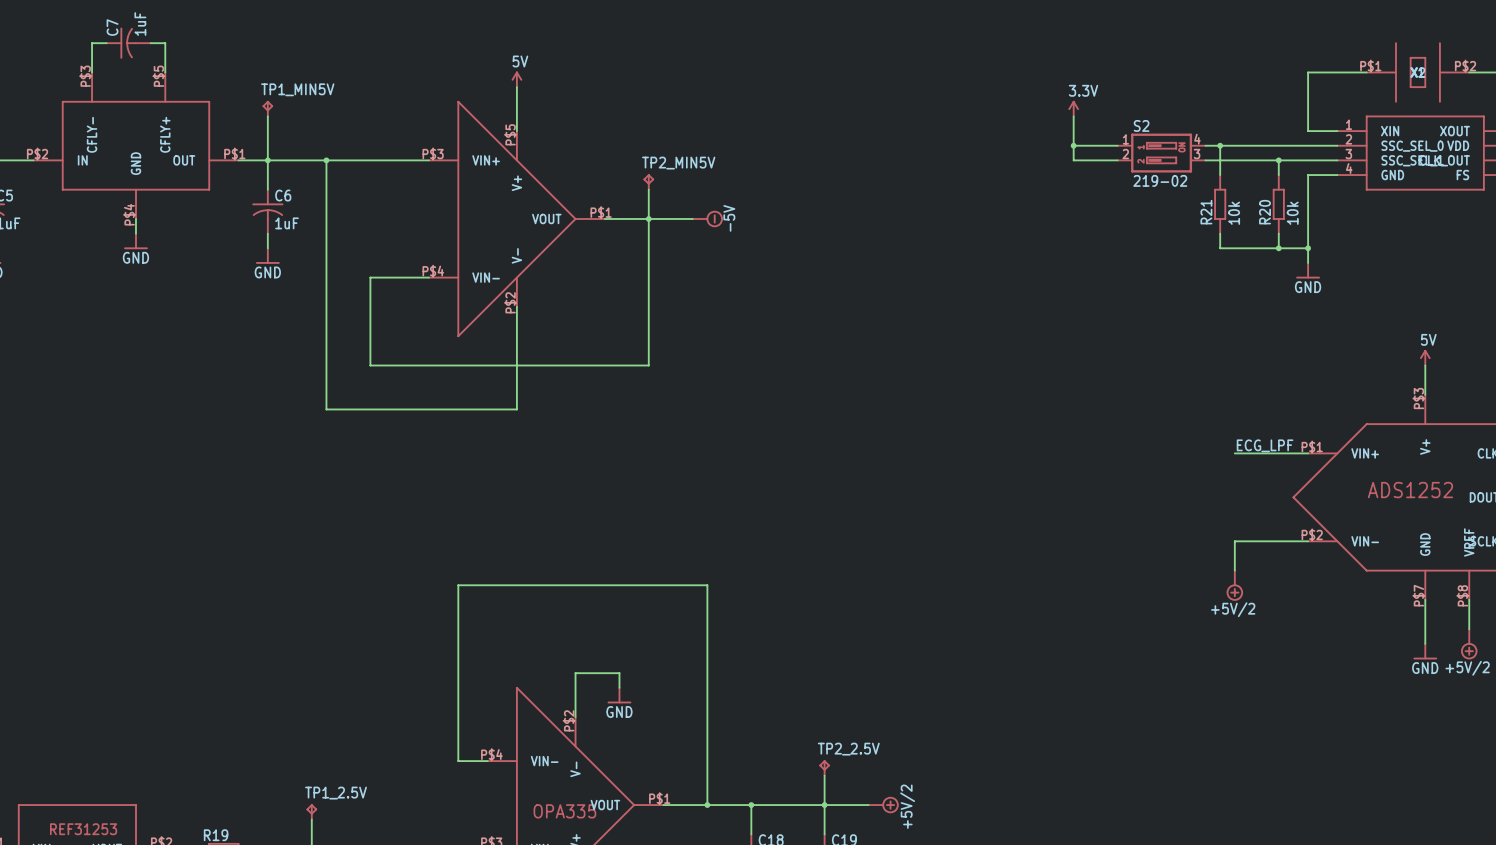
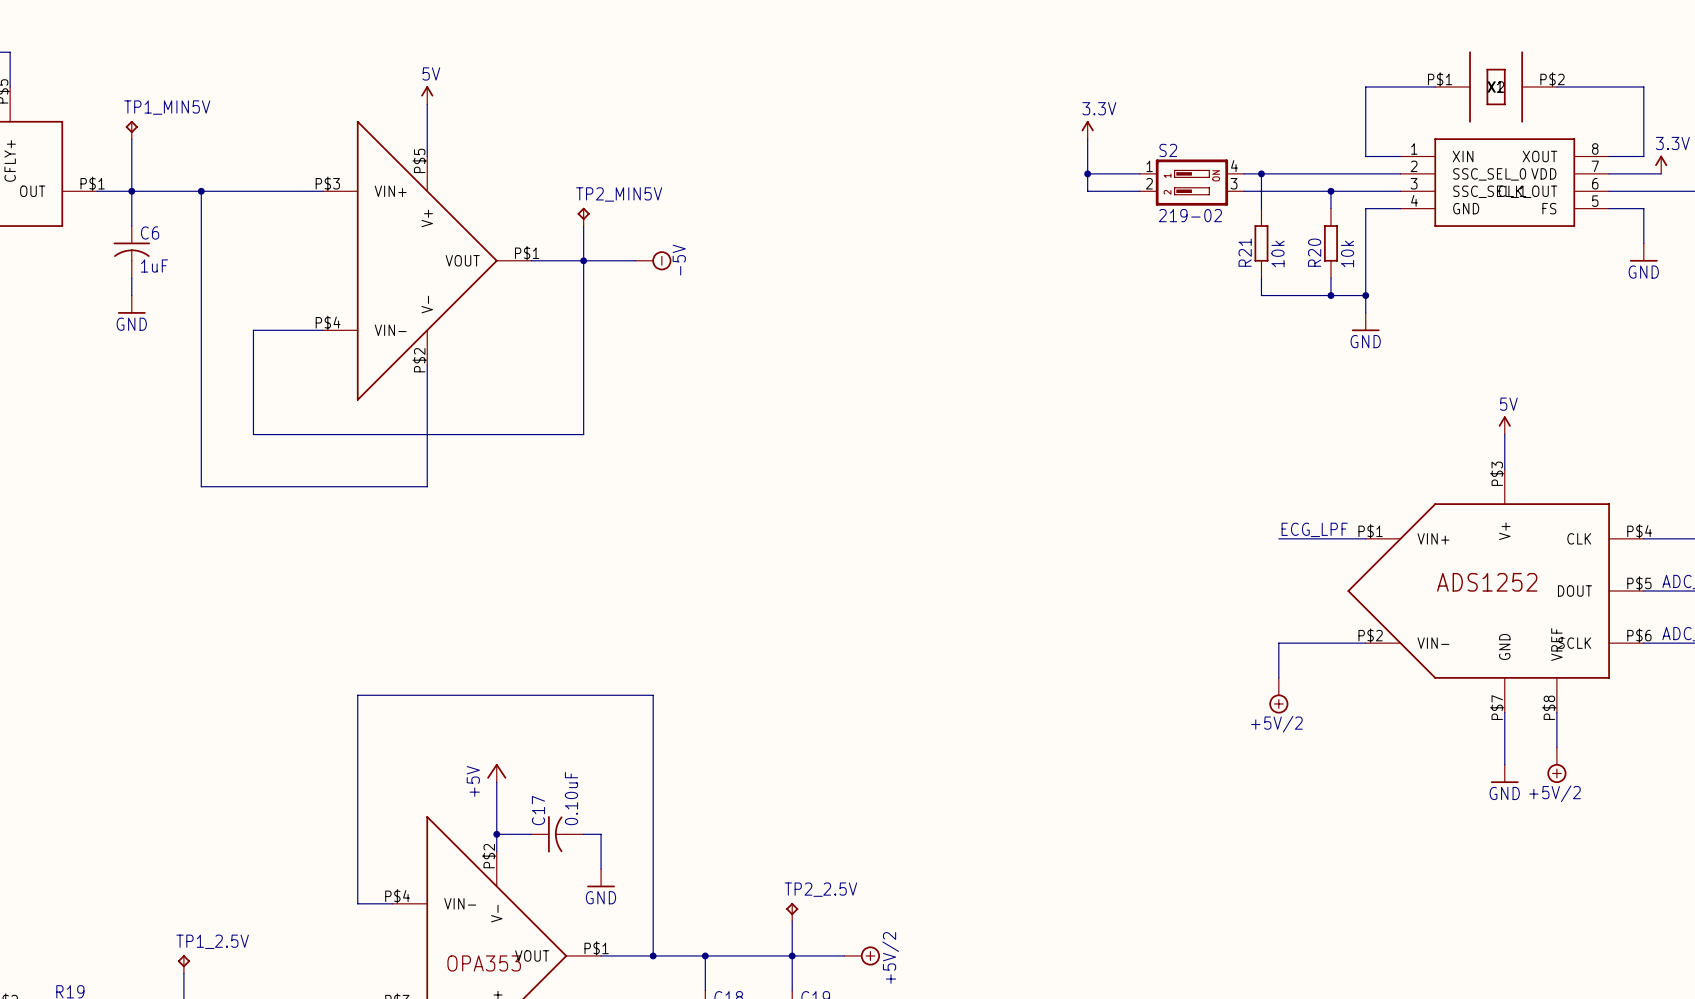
power symbol: none -> +5V (496, 773)
wire: (575, 673) (619, 673) (619, 687) -> (496, 799) (496, 782)
power symbol position: GND (619, 695) -> GND (601, 878)
wire: none -> (496, 834) (531, 834)
junction: none -> (496, 834)
C17: none -> 0.10uF (557, 834)
wire: none -> (583, 834) (601, 834) (601, 869)
part text: OPA335 (564, 811) -> OPA353 (484, 963)

